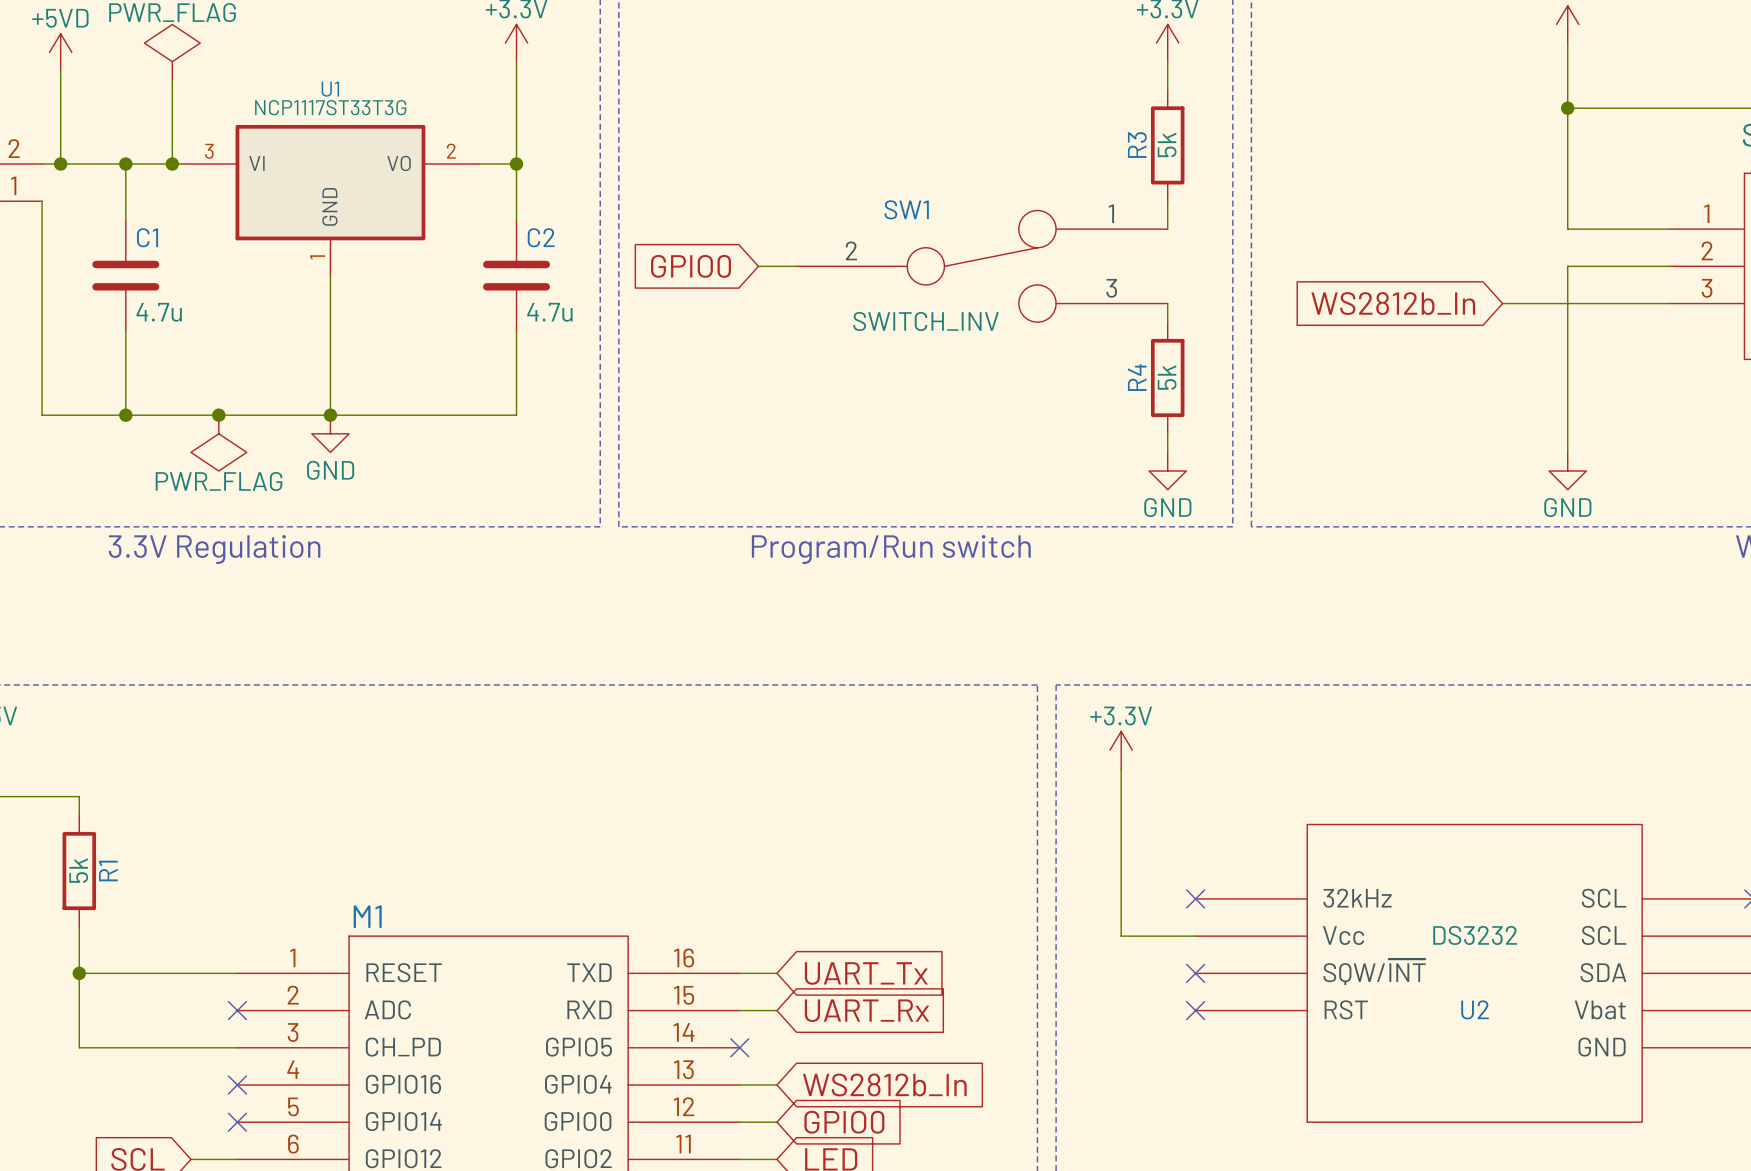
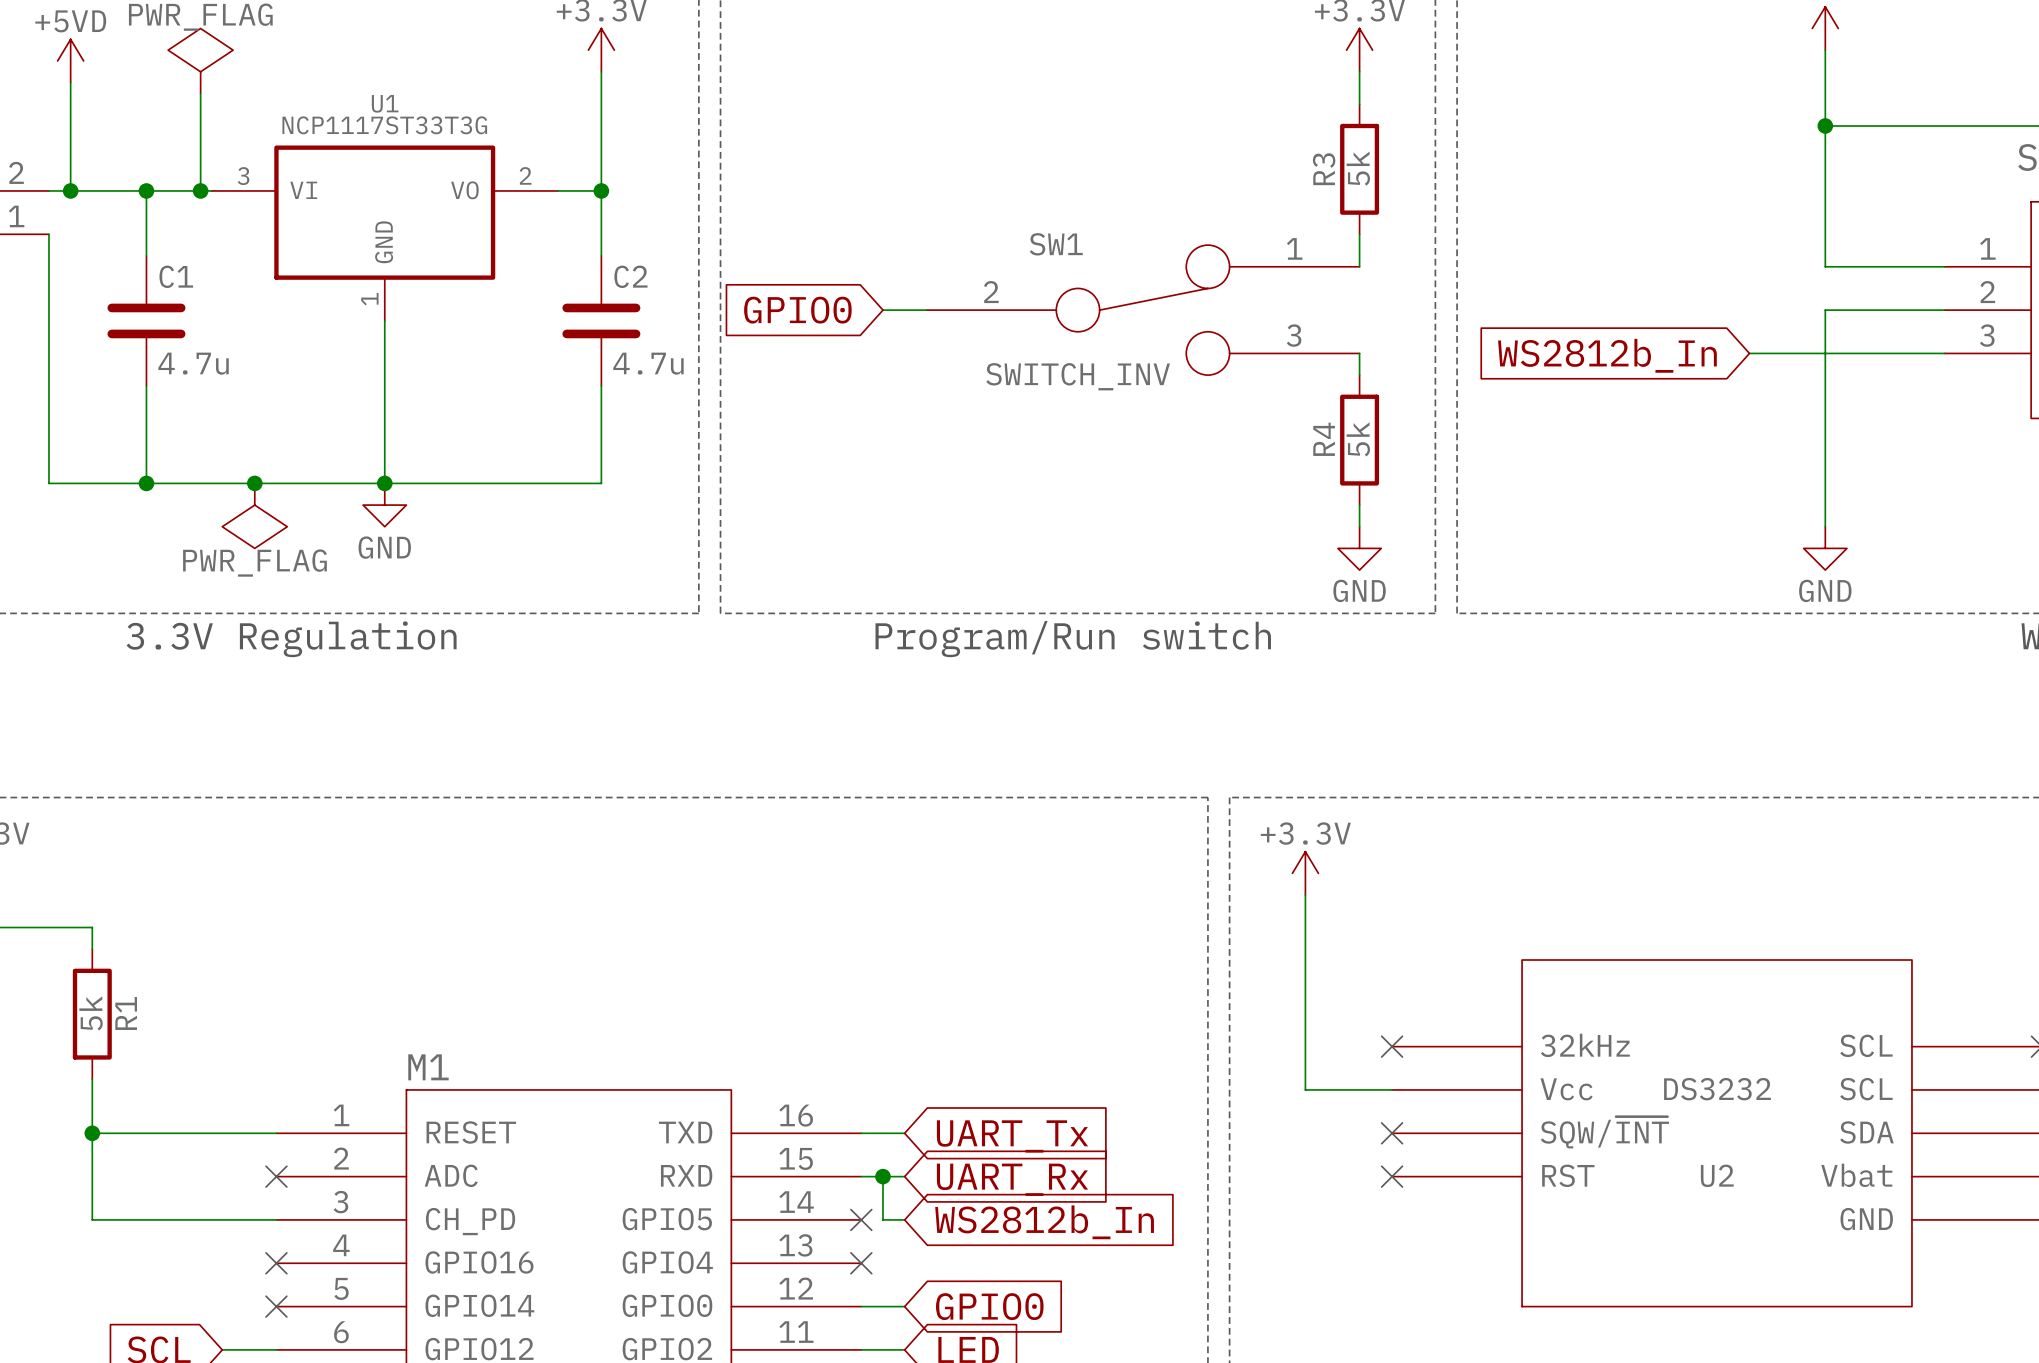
wire: none -> (882, 1176) (882, 1219) (904, 1219)
junction: none -> (882, 1176)
wire: (739, 1084) (776, 1084) -> none
no-connect mark: none -> (861, 1263)
global label position: WS2812b_In (884, 1084) -> WS2812b_In (1044, 1222)

